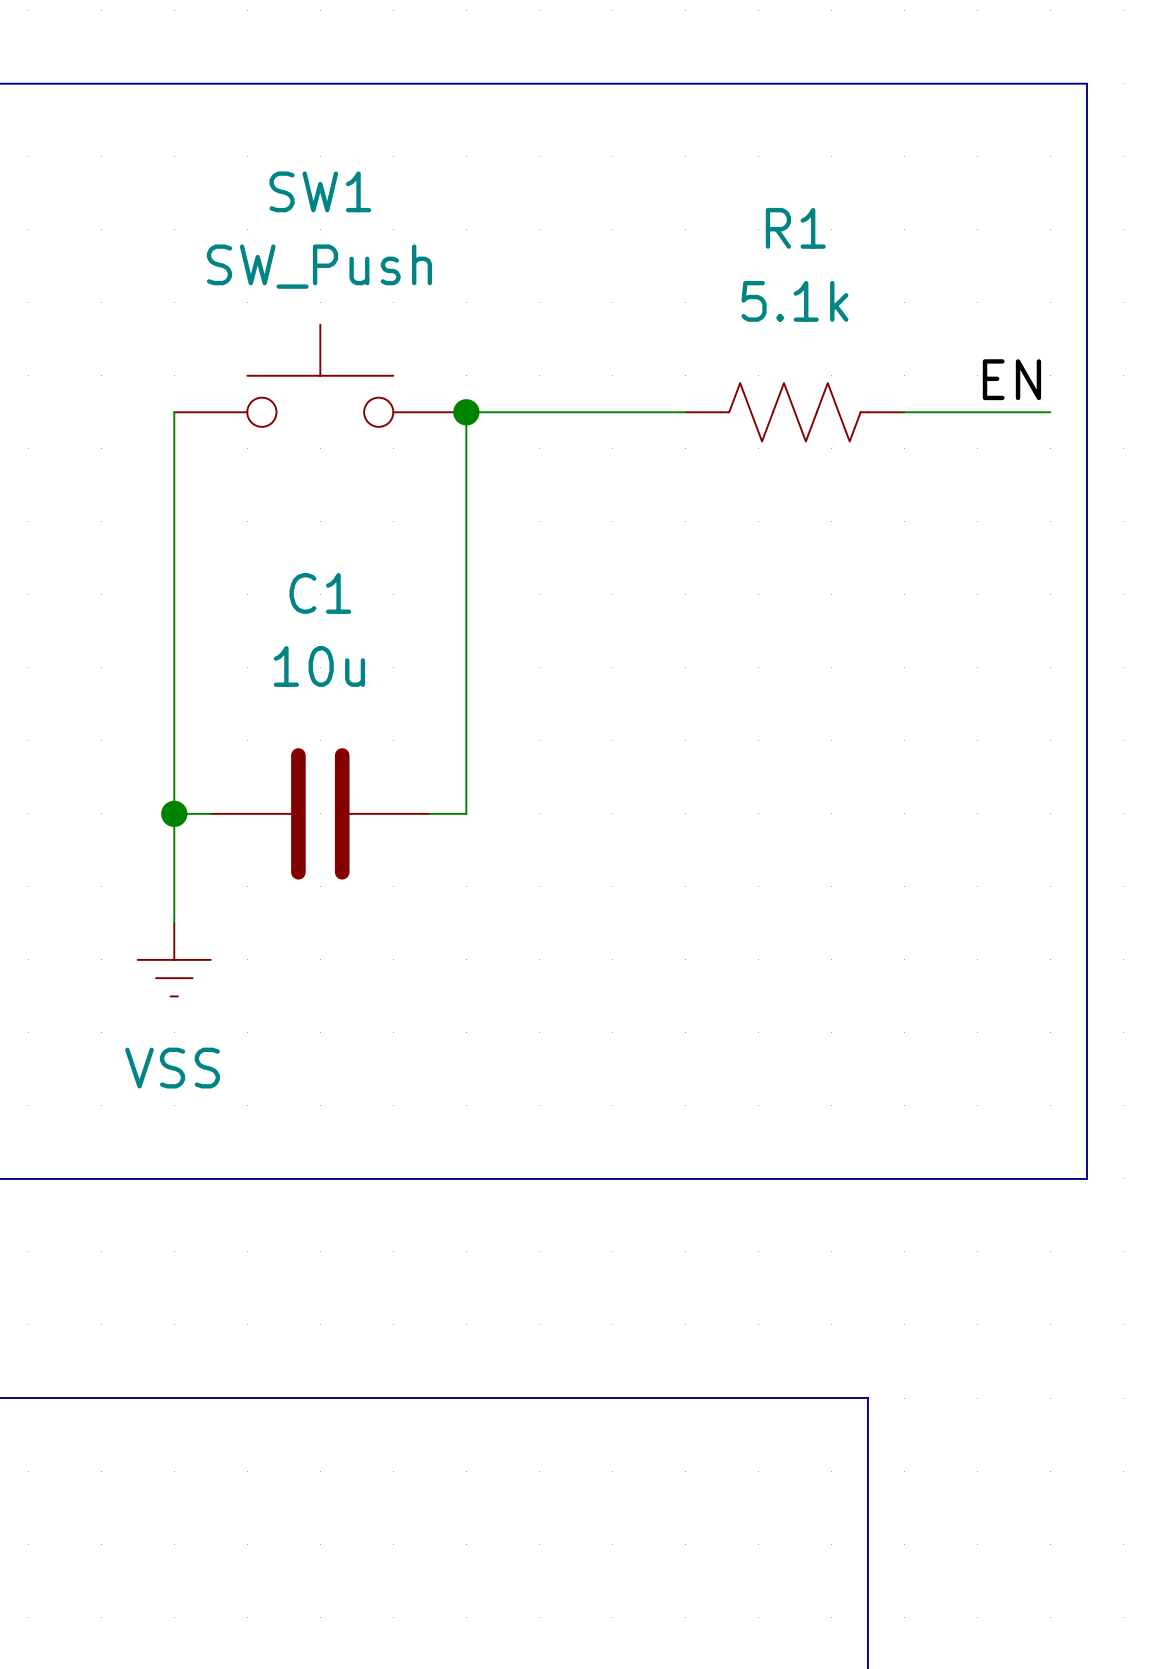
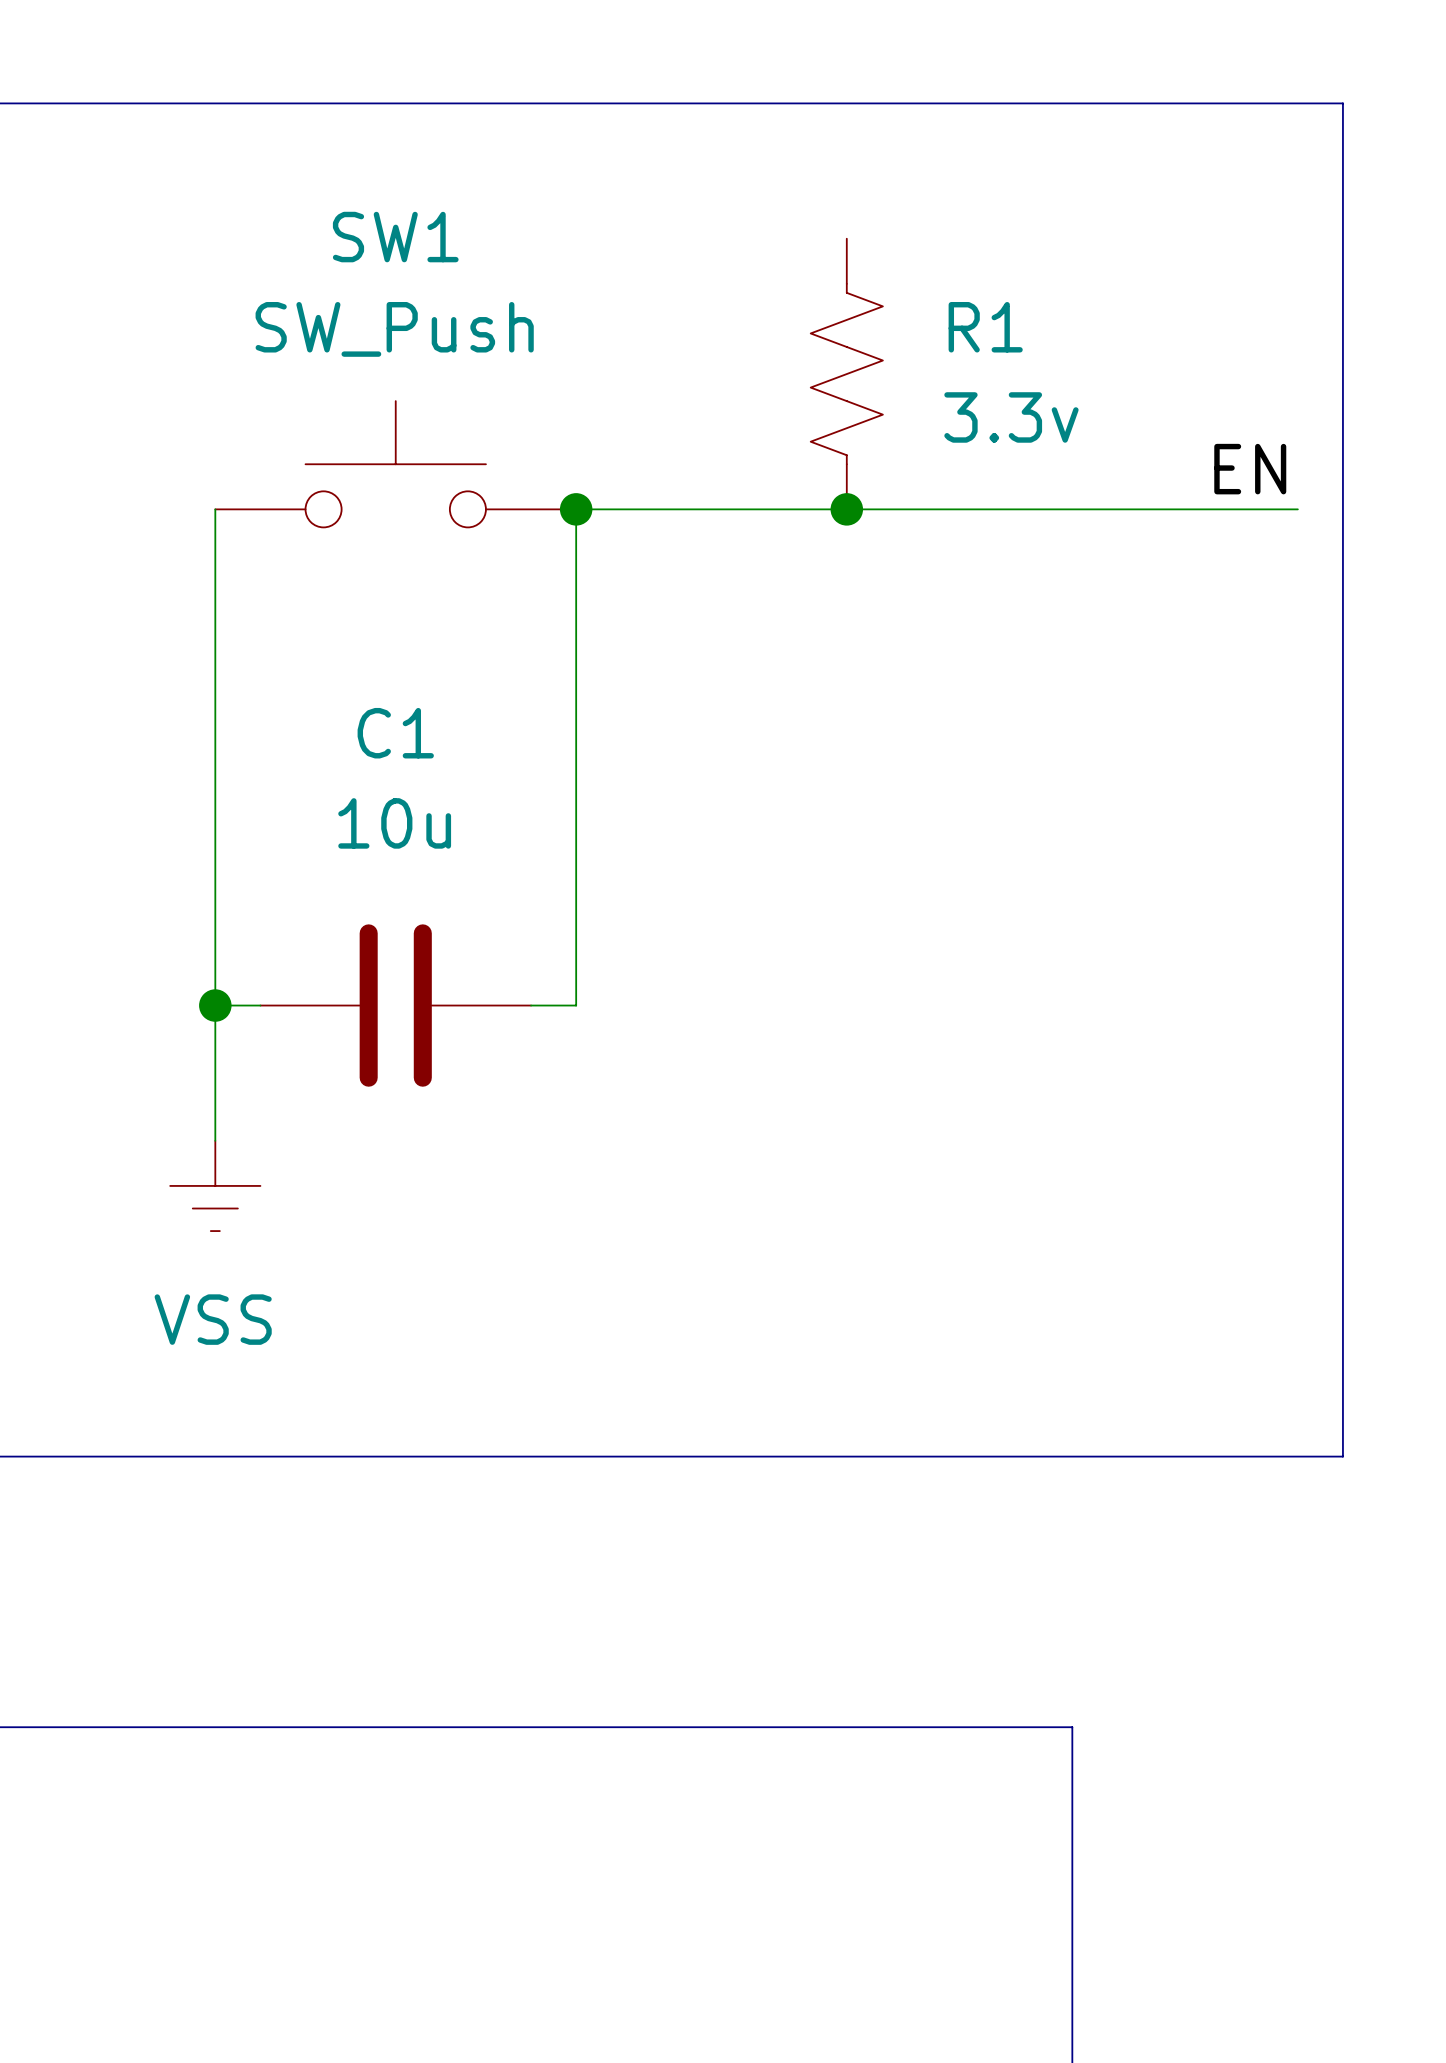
R1 name position: R1 (795, 228) -> R1 (985, 327)
R1 value: 5.1k (794, 301) -> 3.3v (1011, 417)
wire: none -> (846, 509) (1117, 509)
junction: none -> (846, 509)
R1 rotation: 0° (794, 412) -> 90° clockwise (846, 374)
R1 position: (794, 412) -> (846, 374)

